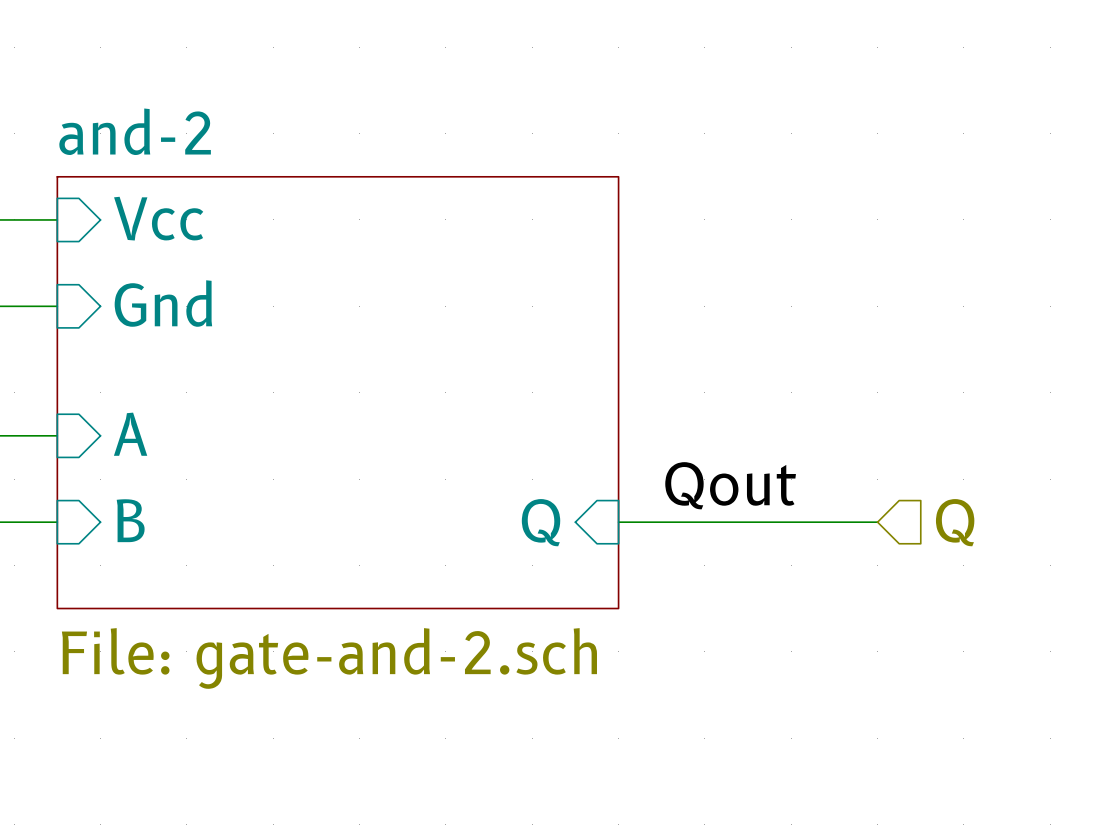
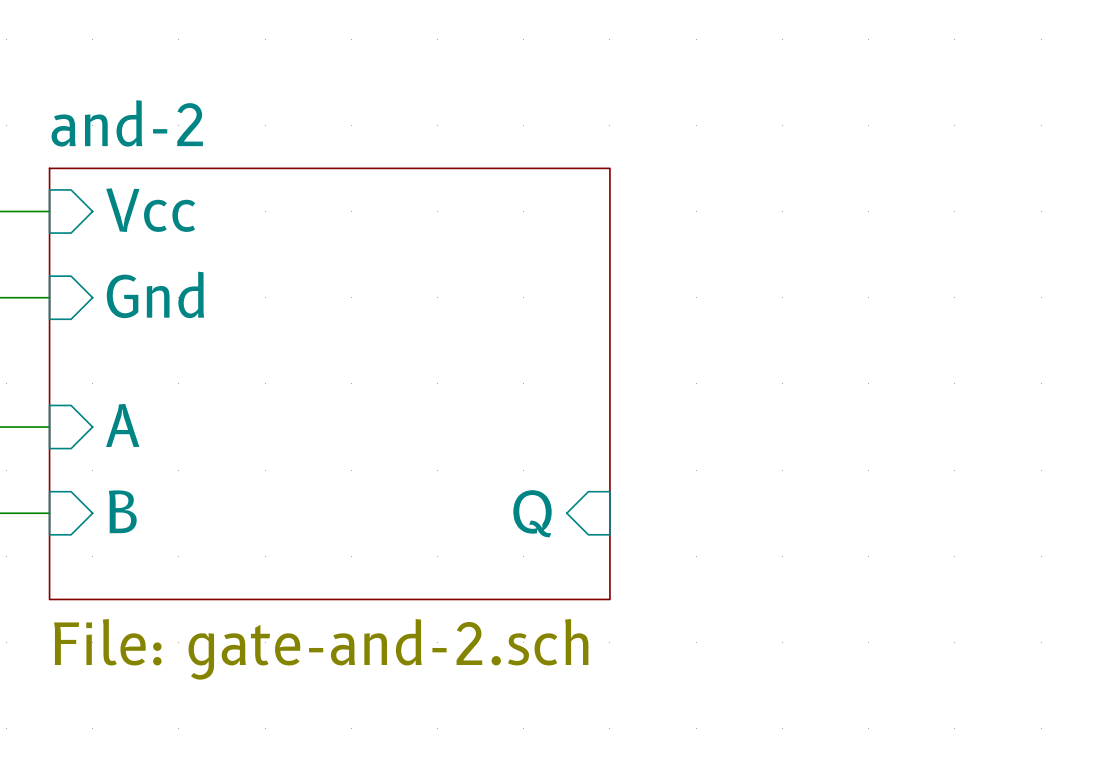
label: Qout (730, 485) -> none
wire: (618, 522) (877, 522) -> none
hierarchical label: Q (955, 522) -> none

